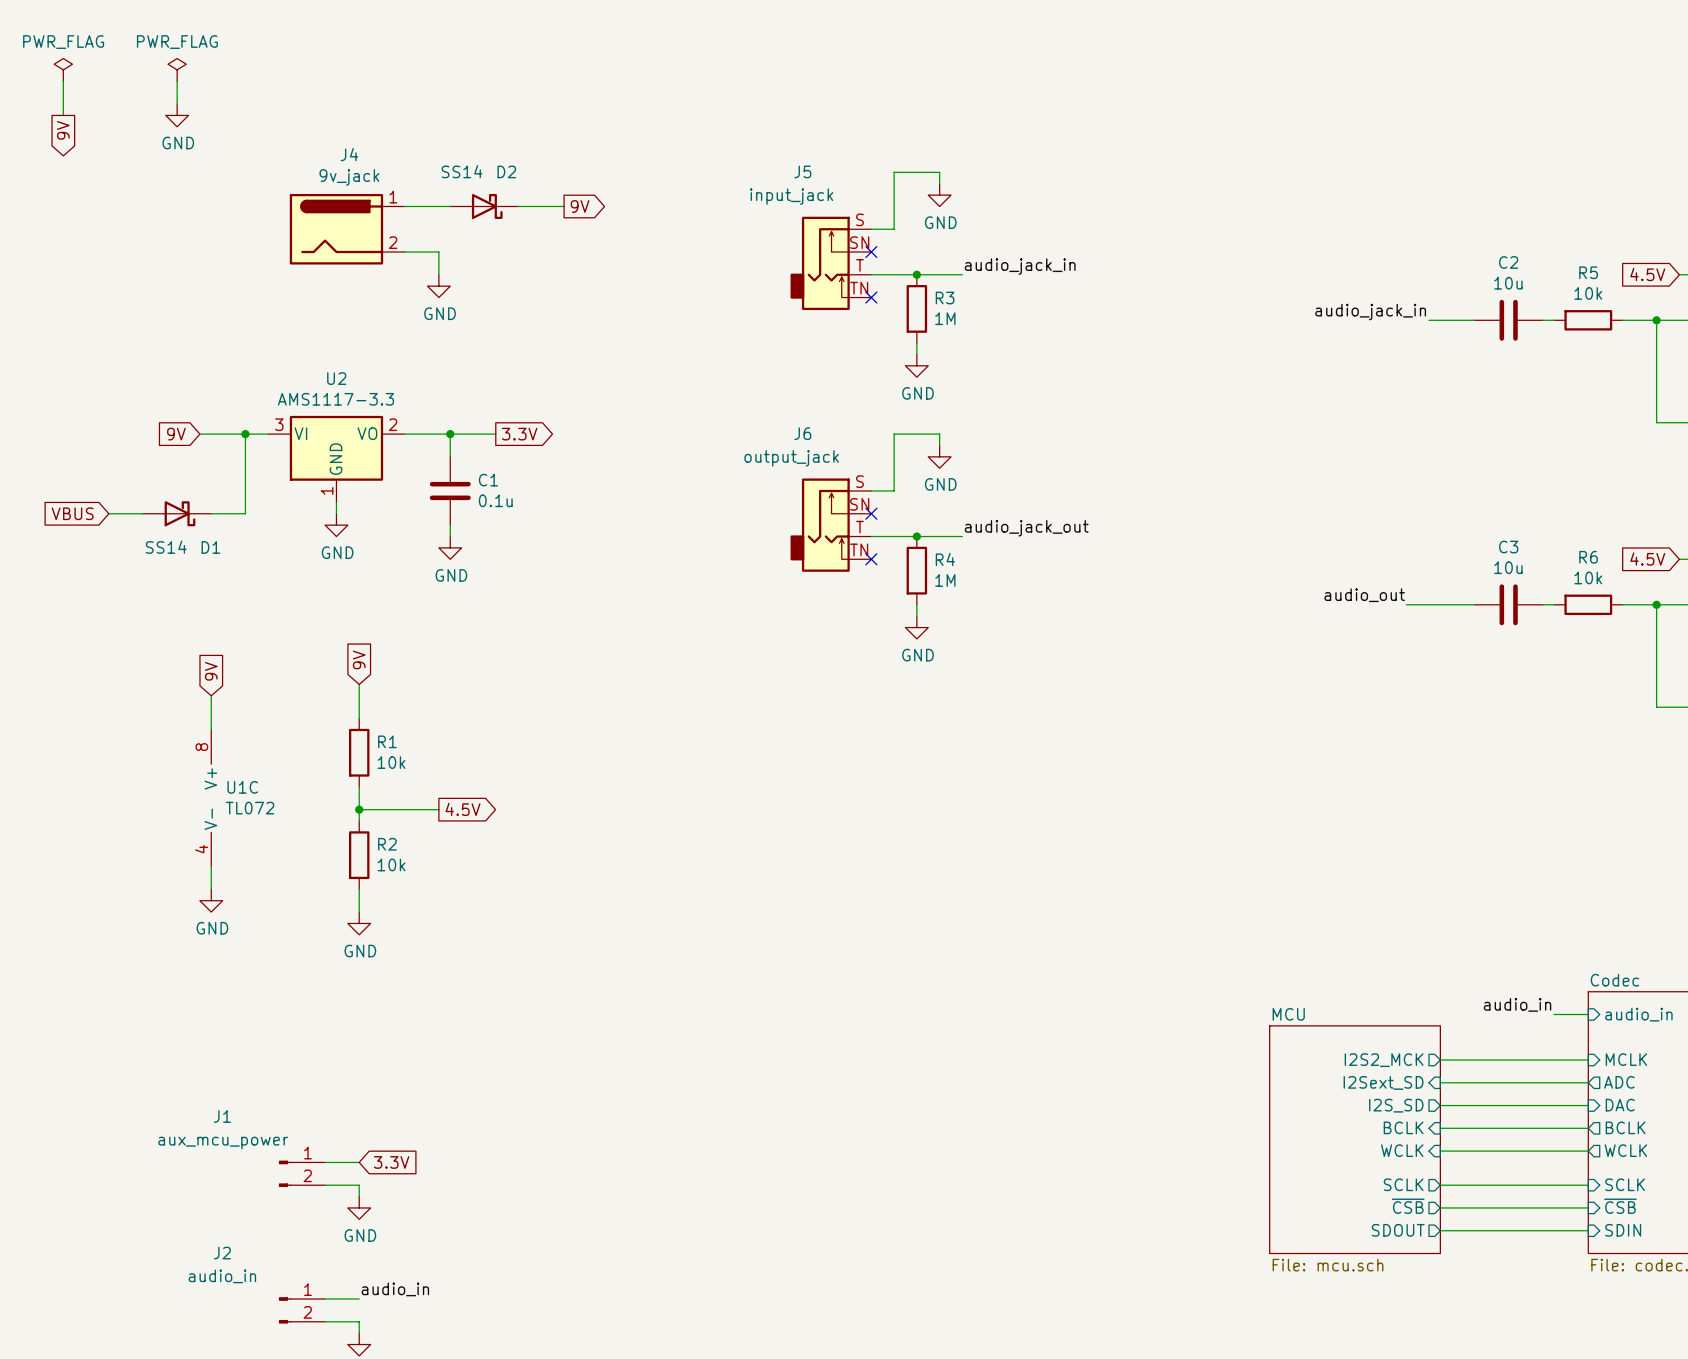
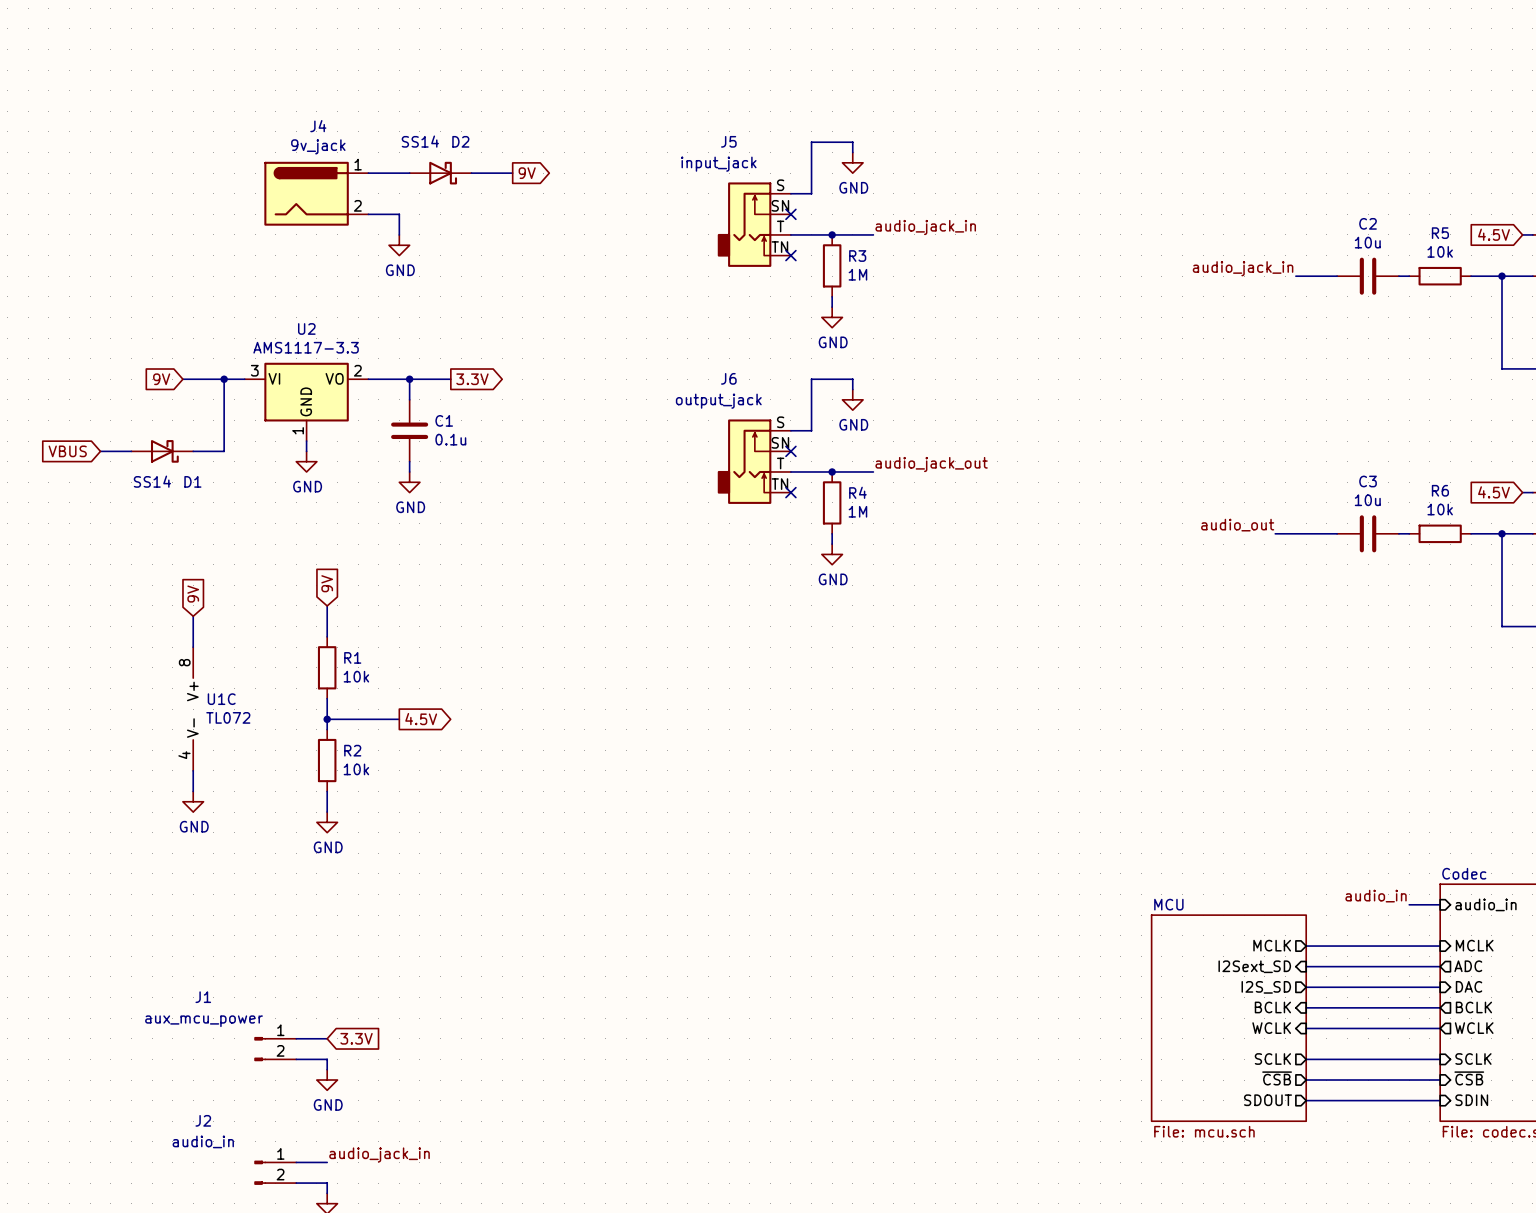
power symbol: PWR_FLAG (63, 69) -> none
power symbol: PWR_FLAG (177, 69) -> none
wire: (63, 81) (63, 115) -> none
wire: (177, 81) (177, 104) -> none
power symbol: GND (177, 115) -> none
global label: 9V (63, 130) -> none
sheet pin: I2S2_MCK (1384, 1060) -> MCLK (1272, 945)
label: audio_in (395, 1289) -> audio_jack_in (379, 1154)

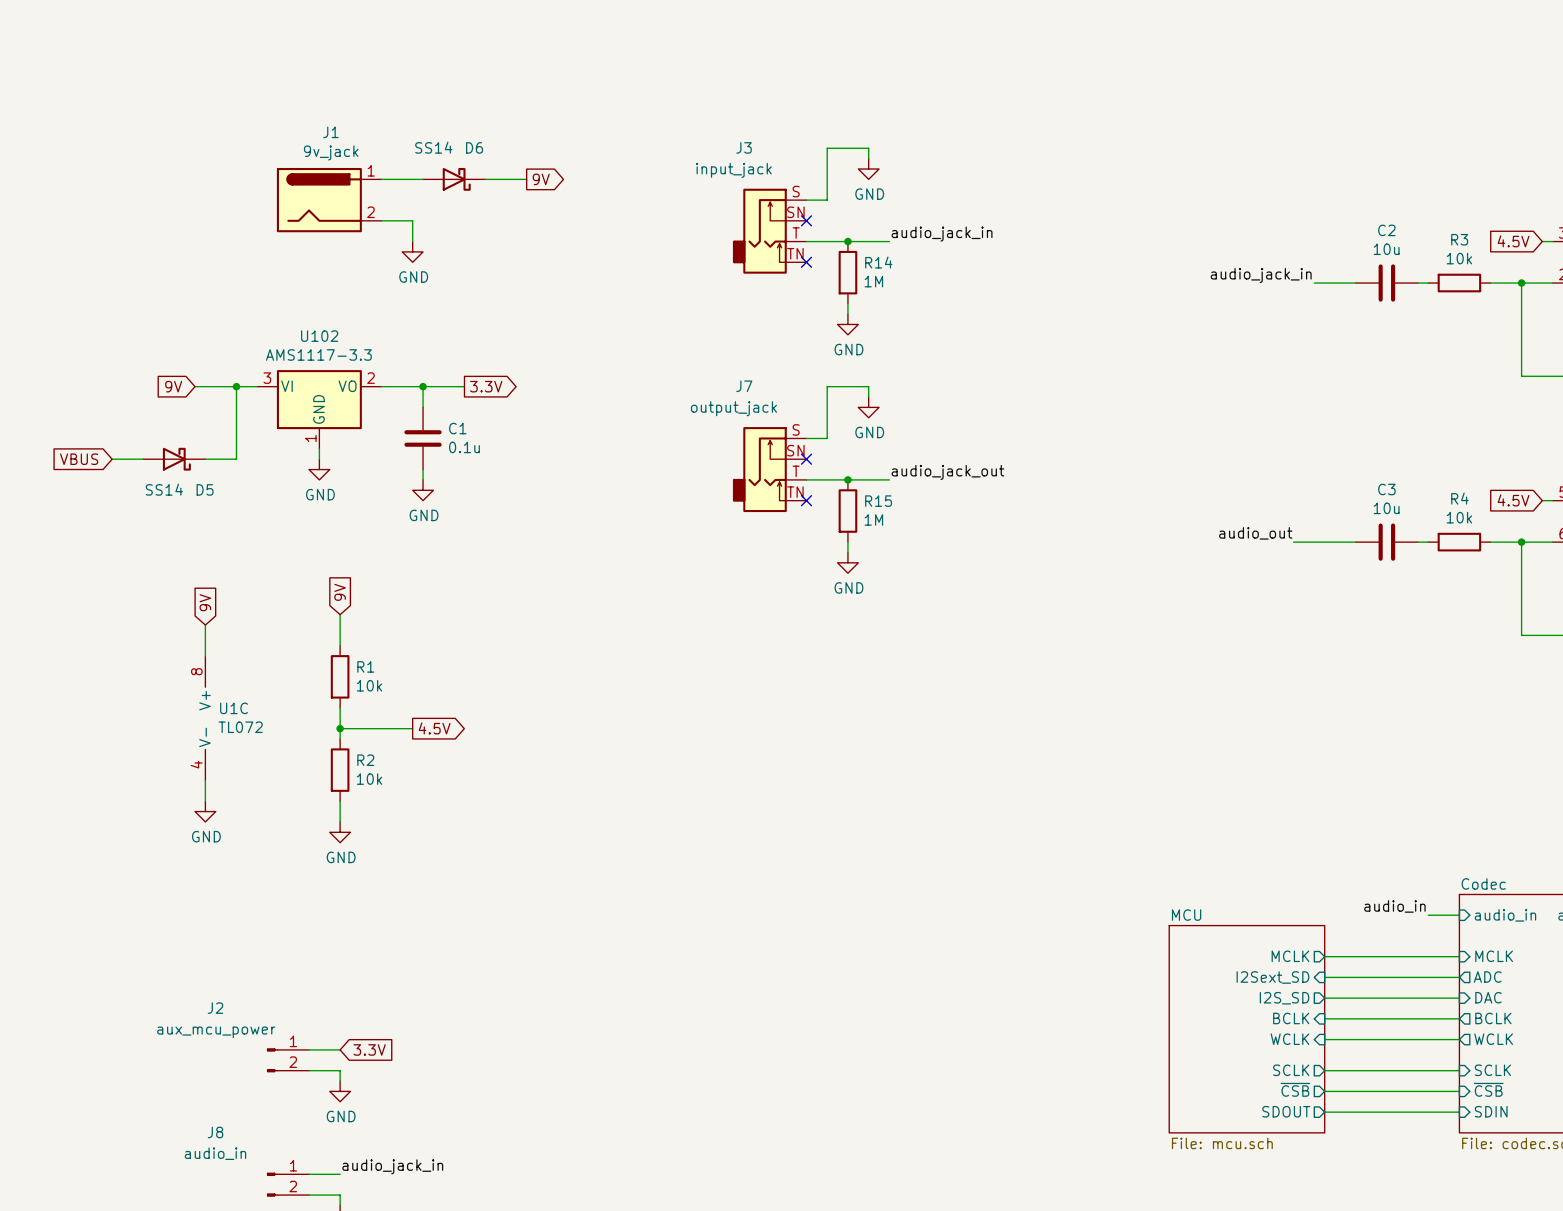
J4 name: J4 (318, 126) -> J1 (330, 132)
D2 name: D2 (460, 141) -> D6 (474, 147)
J5 name: J5 (728, 141) -> J3 (744, 147)
R5 name: R5 (1440, 233) -> R3 (1459, 239)
R3 name: R3 (857, 256) -> R14 (878, 262)
U2 name: U2 (306, 328) -> U102 (319, 336)
J6 name: J6 (728, 378) -> J7 (744, 386)
D1 name: D1 (192, 481) -> D5 (205, 489)
R6 name: R6 (1440, 490) -> R4 (1459, 498)
R4 name: R4 (857, 492) -> R15 (878, 501)
J1 name: J1 (203, 997) -> J2 (215, 1008)
J2 name: J2 (203, 1120) -> J8 (215, 1132)

